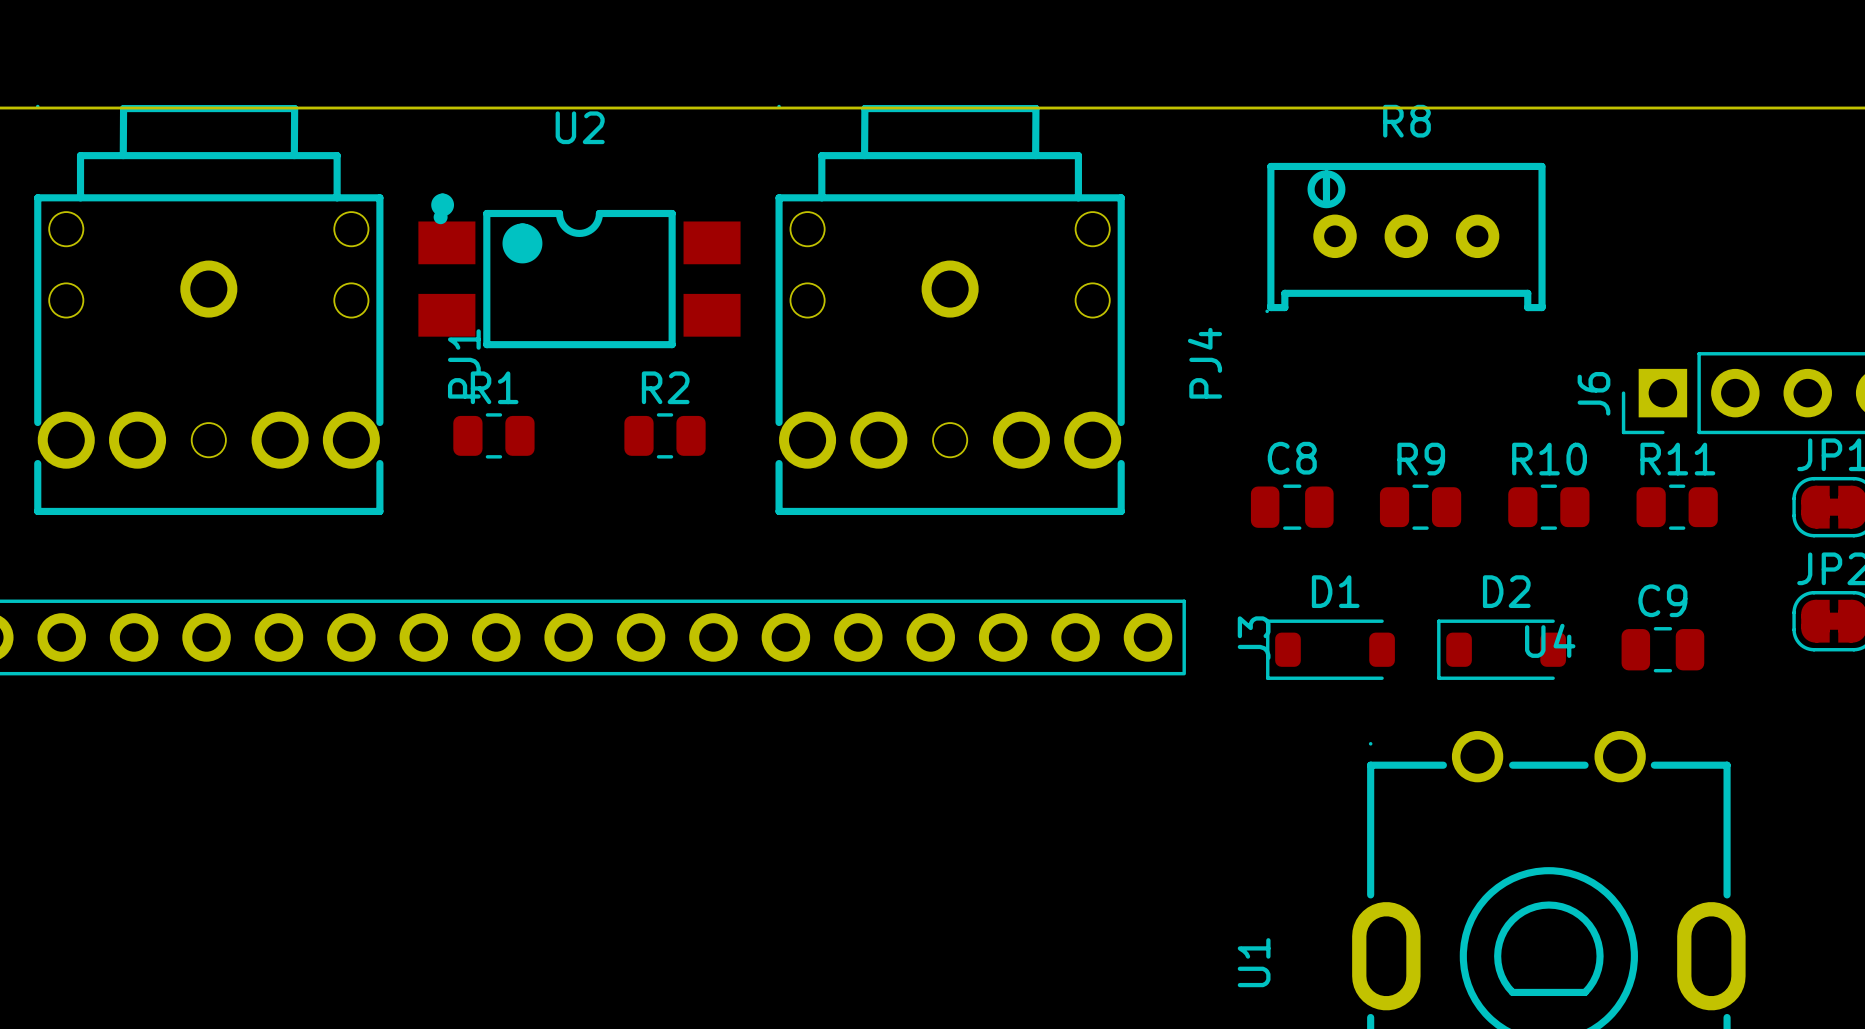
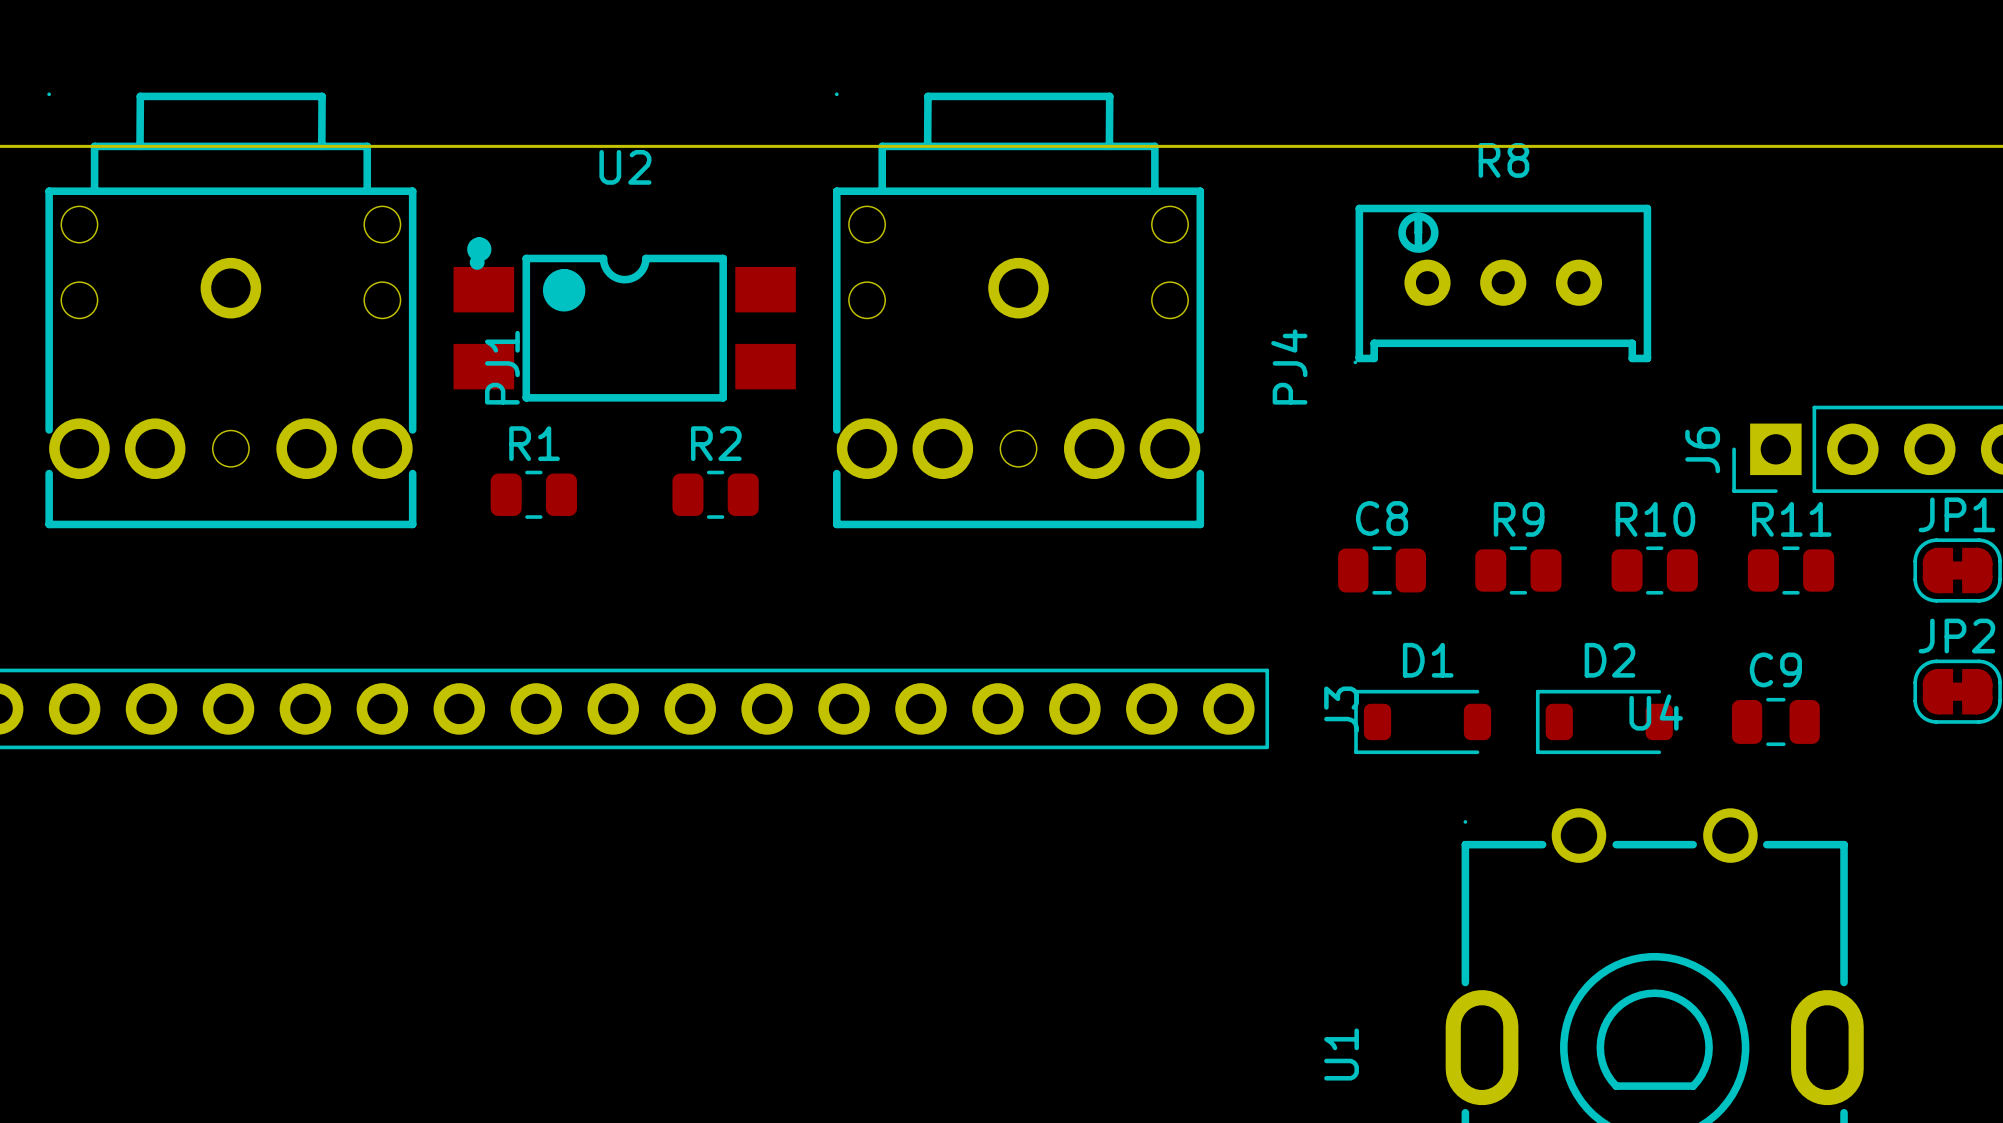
PJ1 position: (208, 309) -> (230, 310)
PJ4 position: (950, 309) -> (1018, 310)

